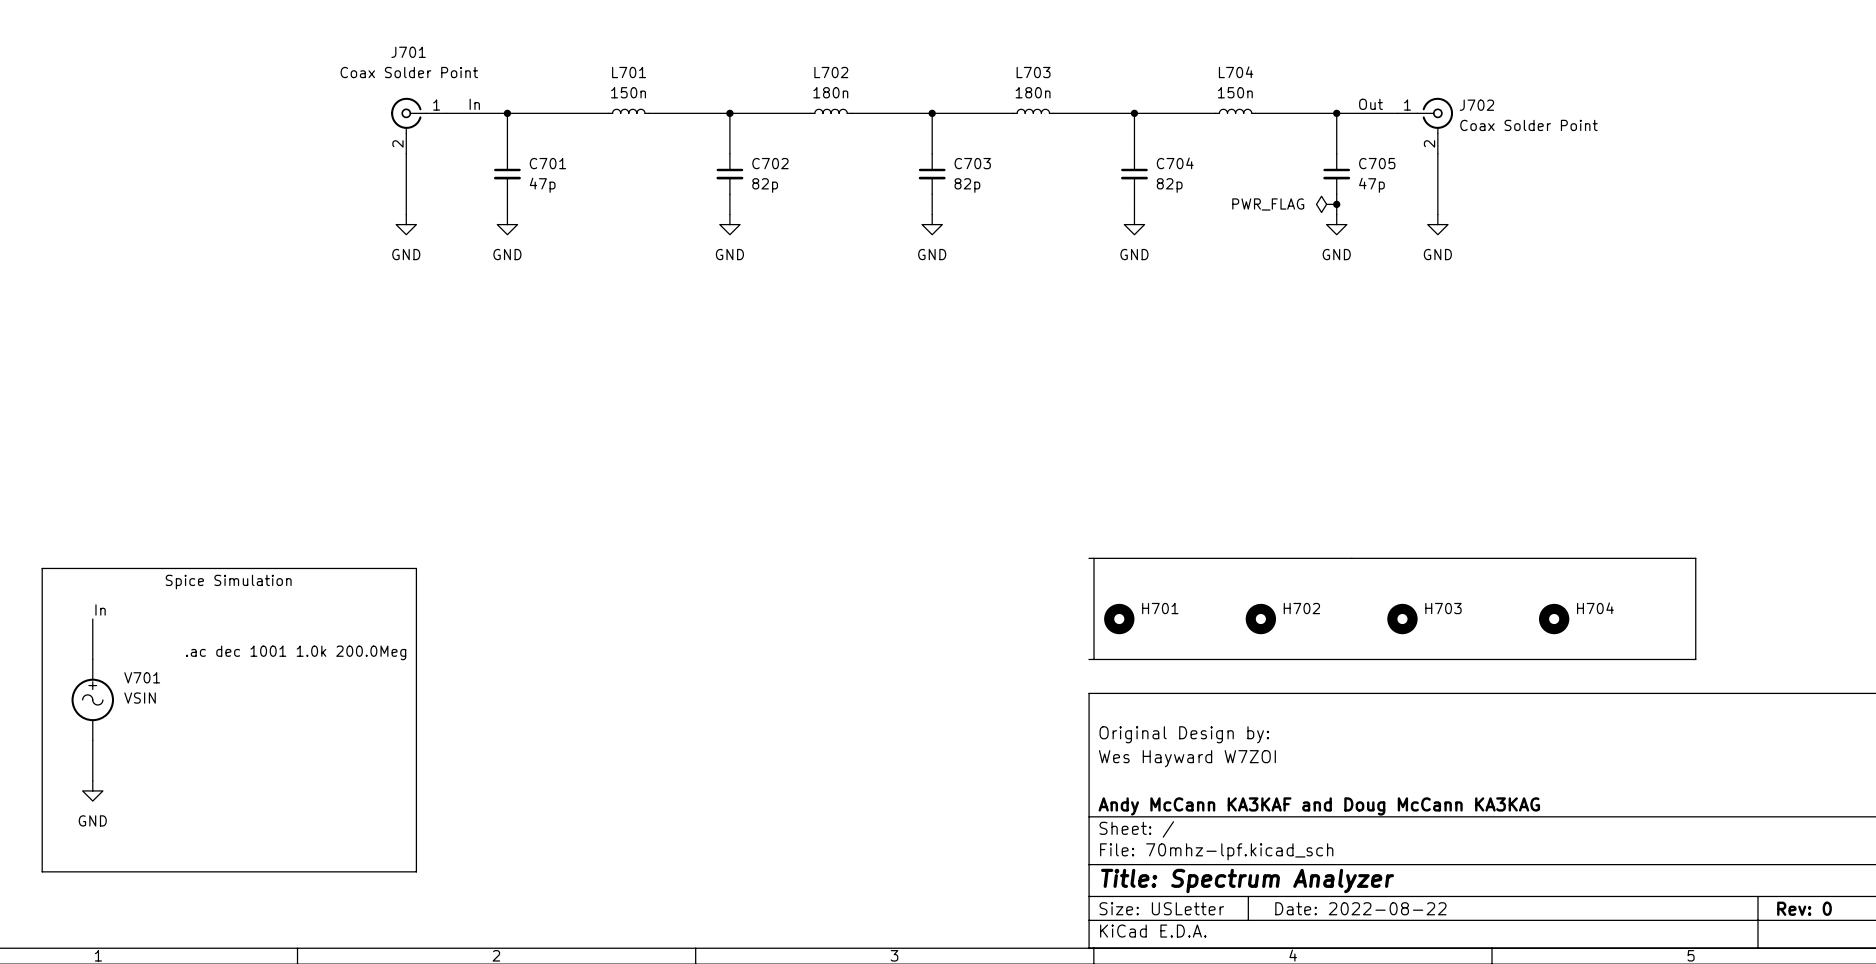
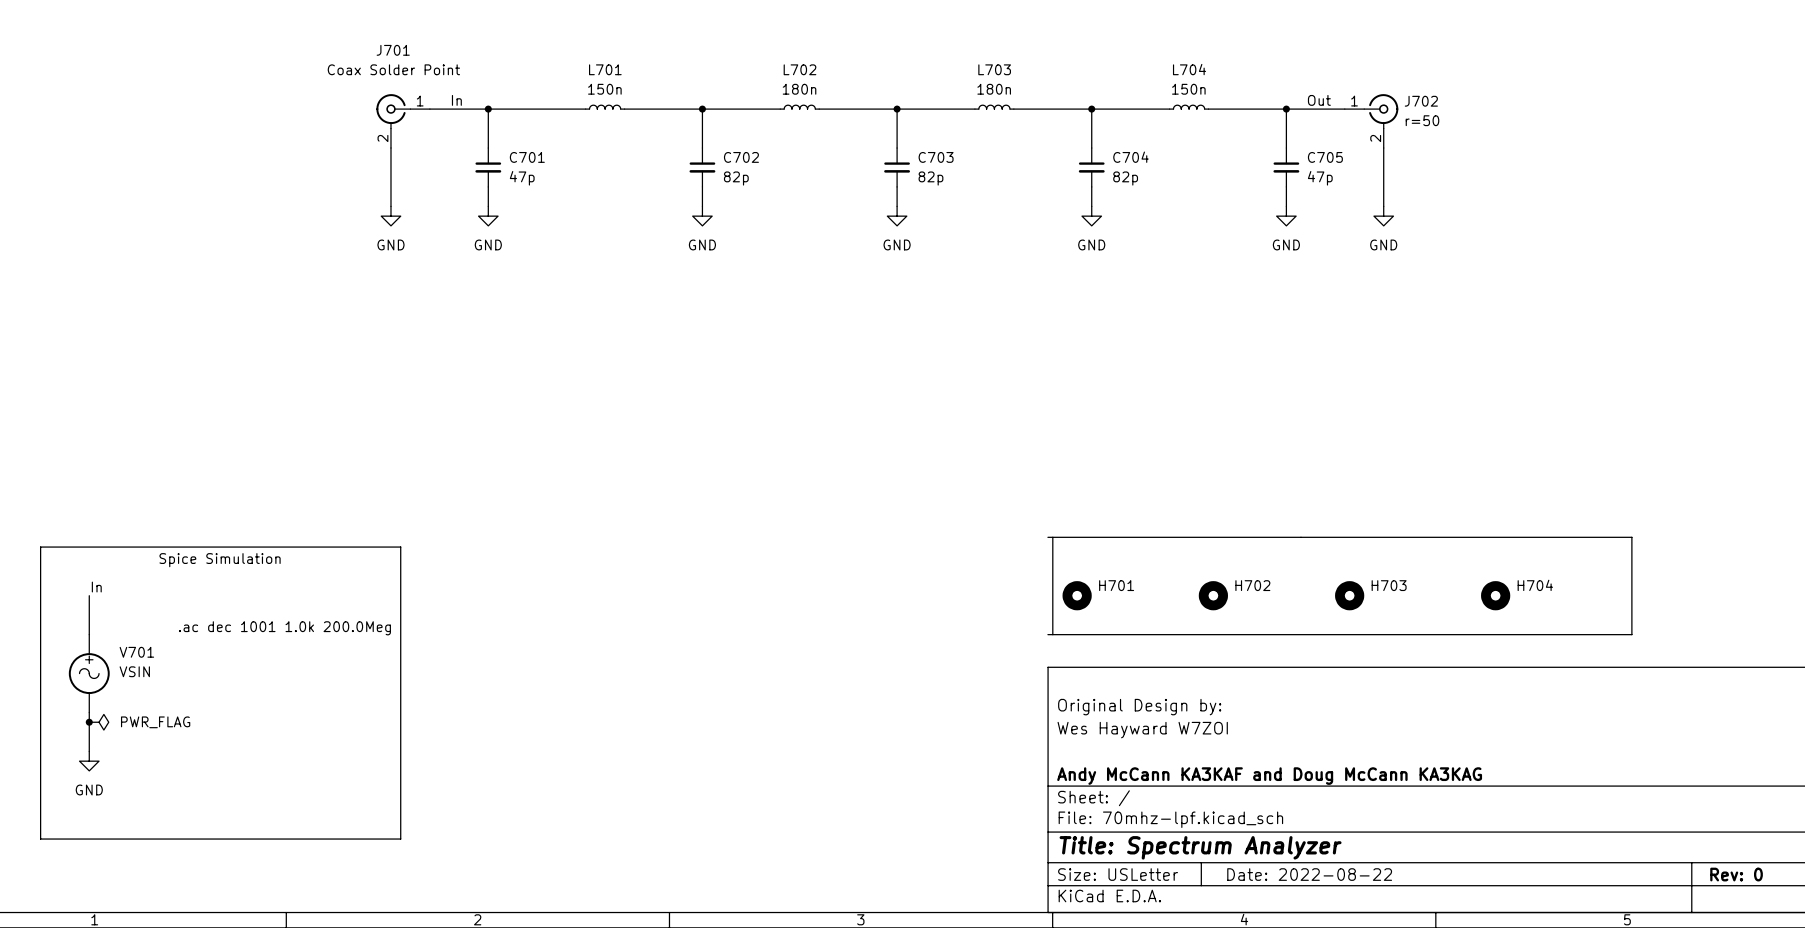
J702 value: Coax Solder Point (1528, 125) -> r=50 (1422, 120)
power symbol: PWR_FLAG (1326, 204) -> none
junction: (1336, 204) -> none
junction: none -> (89, 722)
power symbol: none -> PWR_FLAG (99, 722)

